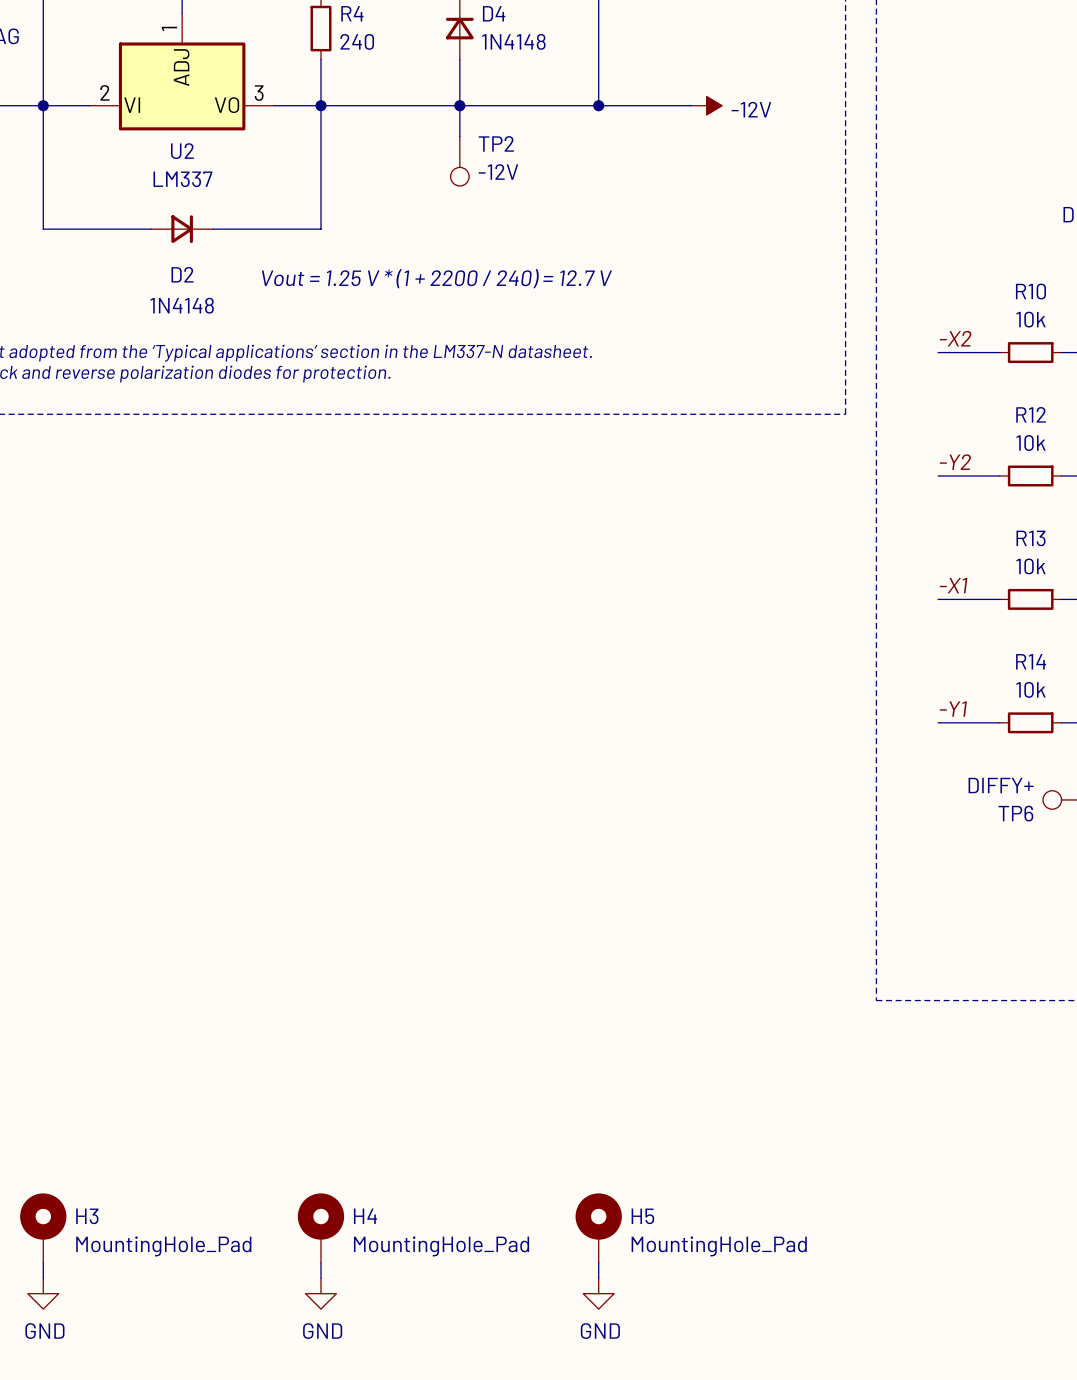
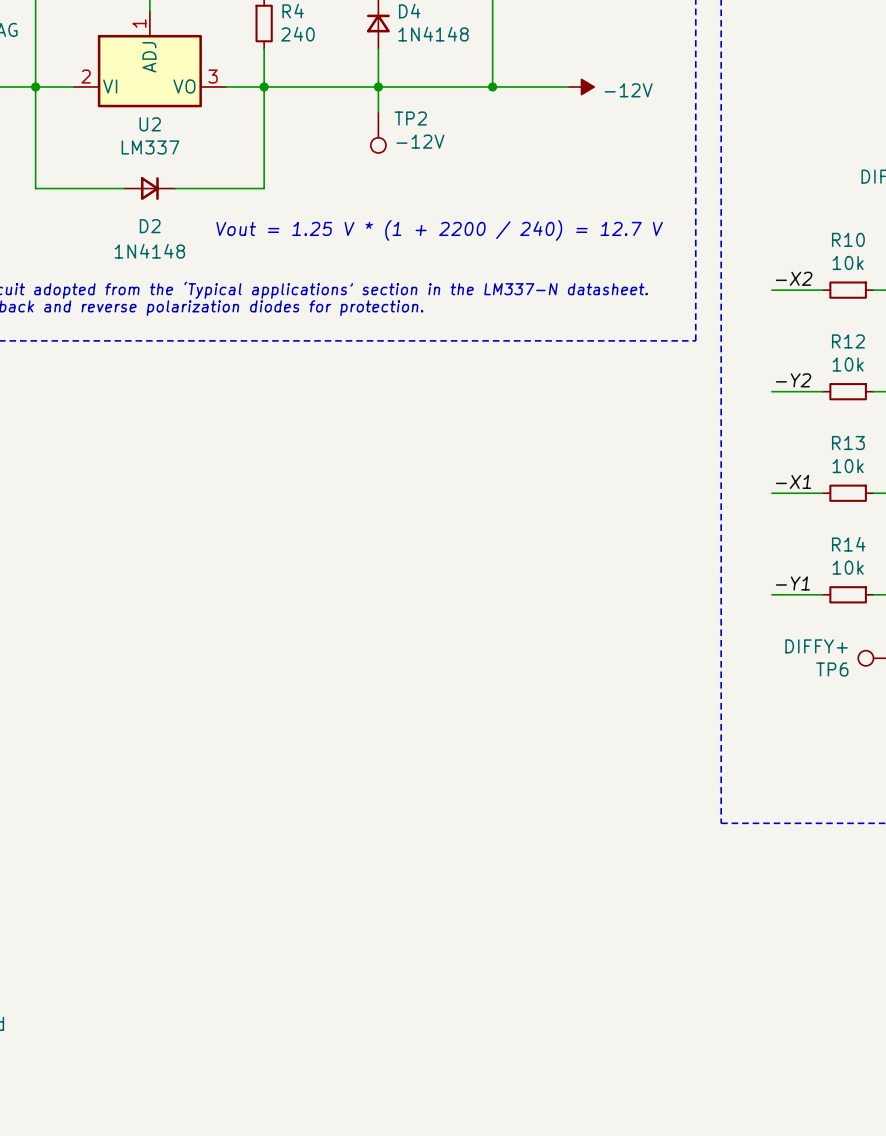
H3: MountingHole_Pad (43, 1228) -> none
H4: MountingHole_Pad (321, 1228) -> none
H5: MountingHole_Pad (598, 1228) -> none
wire: (43, 1262) (43, 1278) -> none
wire: (321, 1262) (321, 1278) -> none
wire: (598, 1262) (598, 1278) -> none
power symbol: GND (43, 1293) -> none
power symbol: GND (321, 1293) -> none
power symbol: GND (598, 1293) -> none

